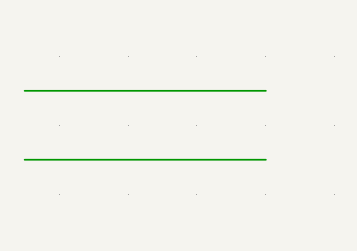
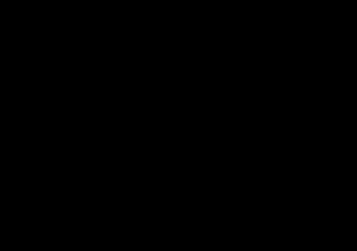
wire: (24, 90) (265, 90) -> none
wire: (24, 159) (265, 159) -> none

